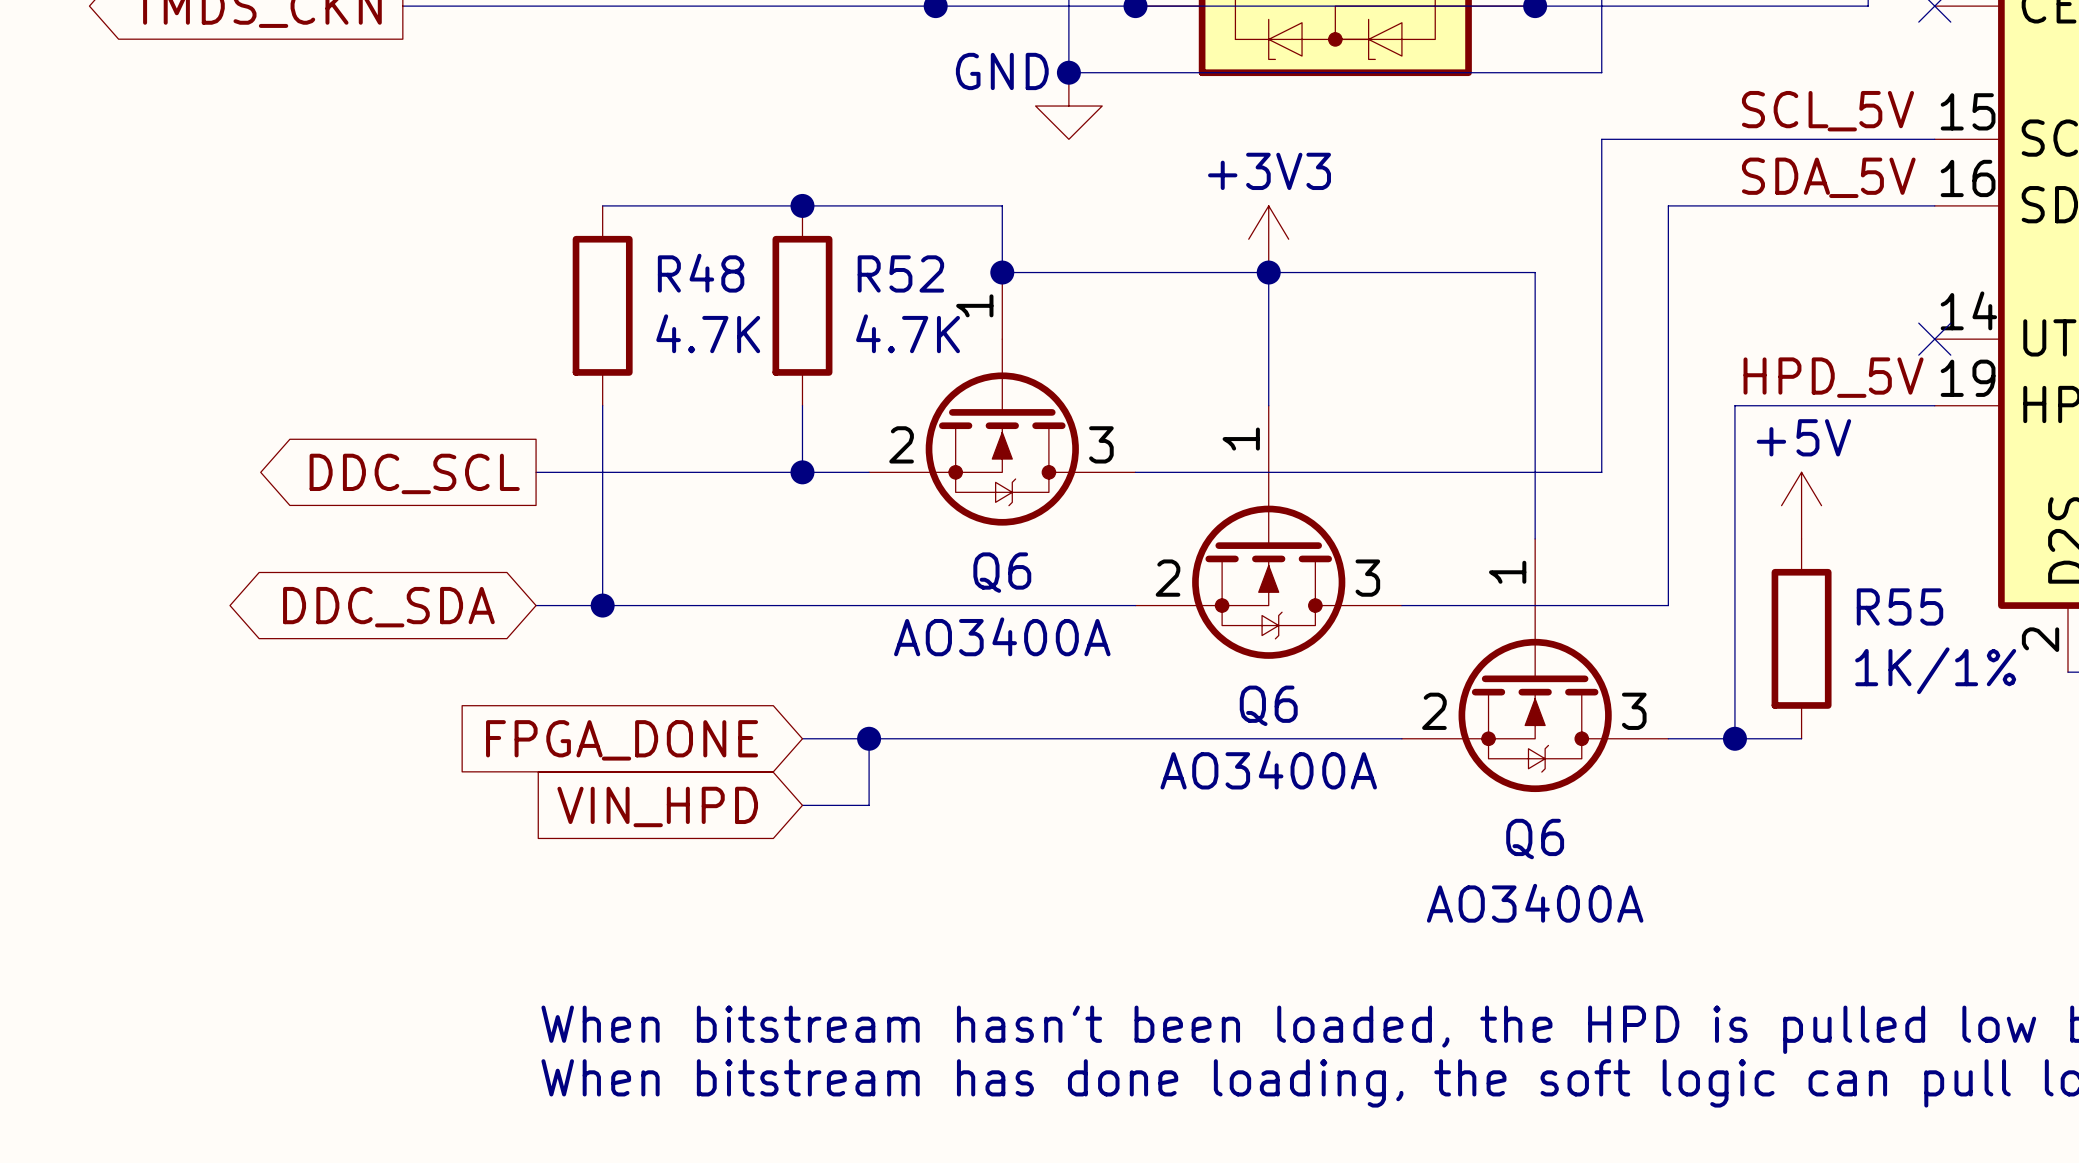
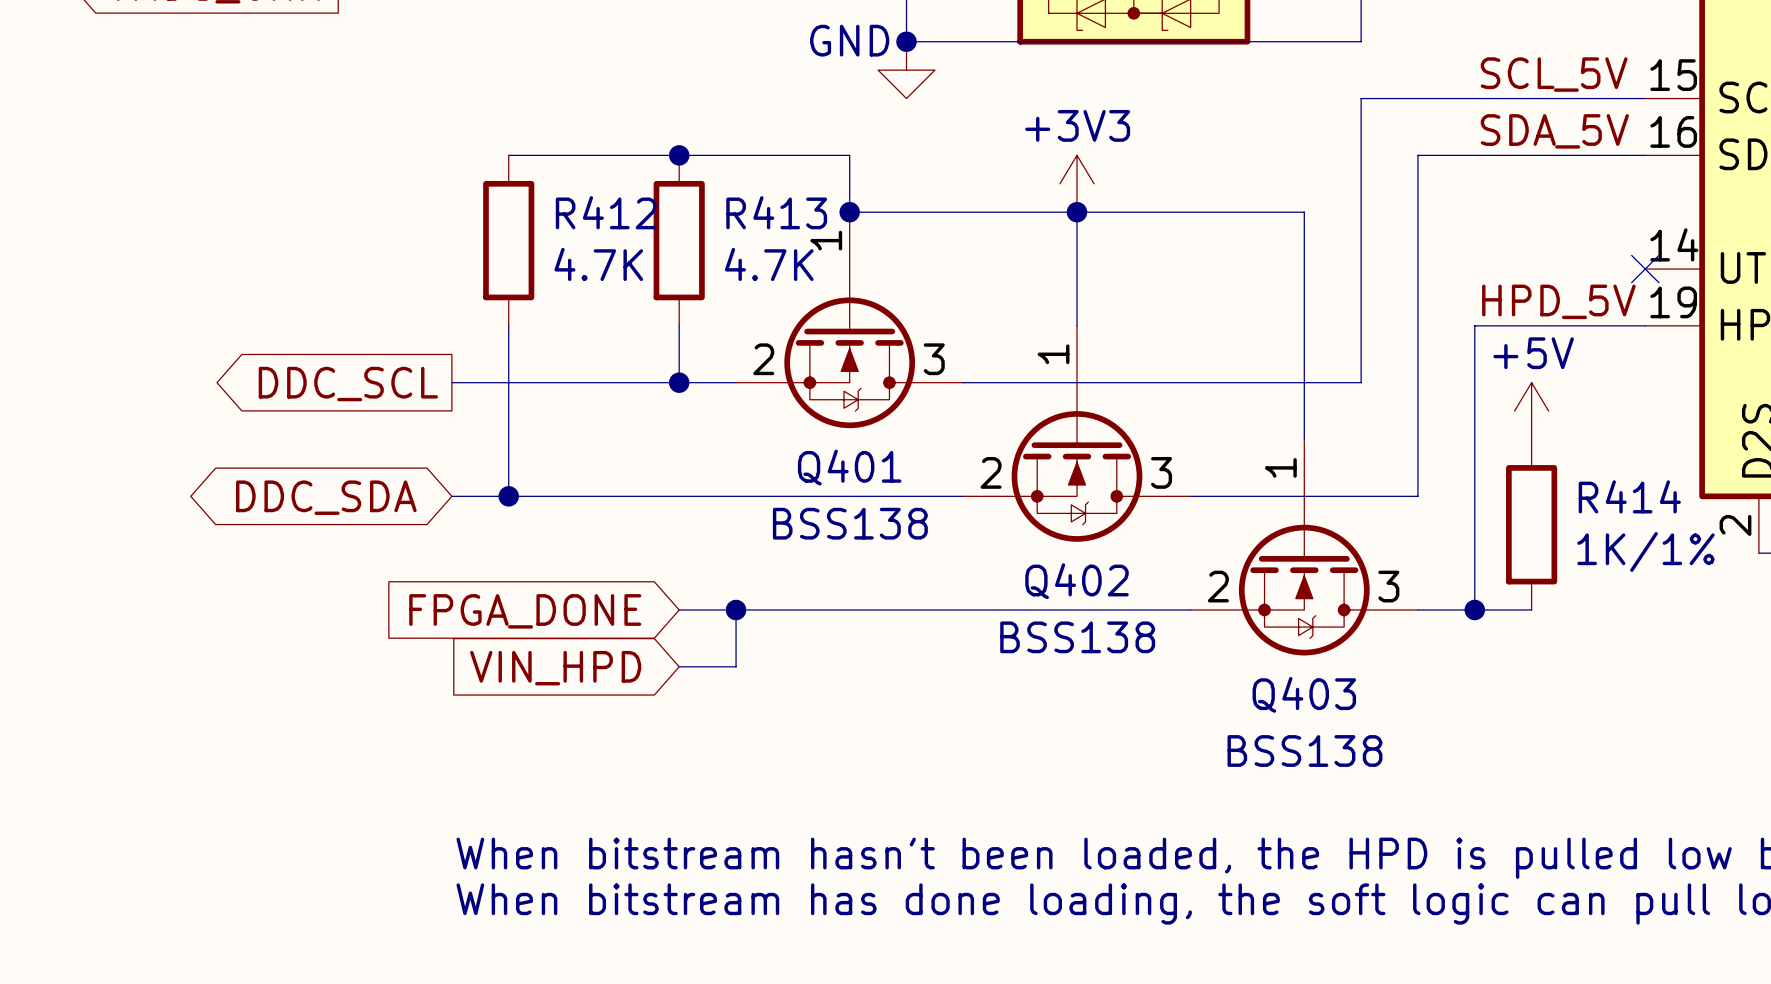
R48 name: R48 (701, 273) -> R412 (606, 212)
R52 name: R52 (900, 273) -> R413 (776, 212)
Q6 name: Q6 (1002, 572) -> Q401 (849, 467)
R55 name: R55 (1899, 606) -> R414 (1629, 496)
Q6 value: AO3400A (1002, 636) -> BSS138 (850, 523)
Q6 name: Q6 (1268, 705) -> Q402 (1076, 581)
Q6 value: AO3400A (1268, 770) -> BSS138 (1077, 637)
Q6 name: Q6 (1535, 839) -> Q403 (1304, 694)
Q6 value: AO3400A (1535, 903) -> BSS138 (1304, 751)

